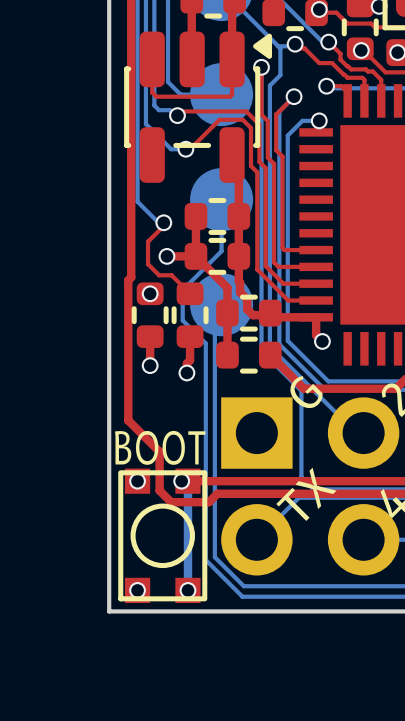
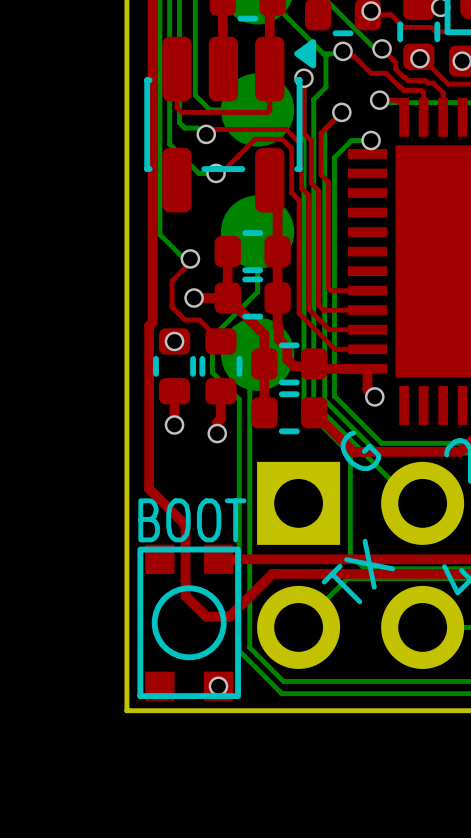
via: (137, 481) -> none
bottom track: (181, 481) (187, 487) (187, 590) -> none
via: (181, 481) -> none
top track: (159, 490) (171, 502) (208, 502) (217, 493) (234, 493) -> (185, 570) (185, 595) (206, 616) (229, 616) (272, 573)
via: (137, 590) -> none

